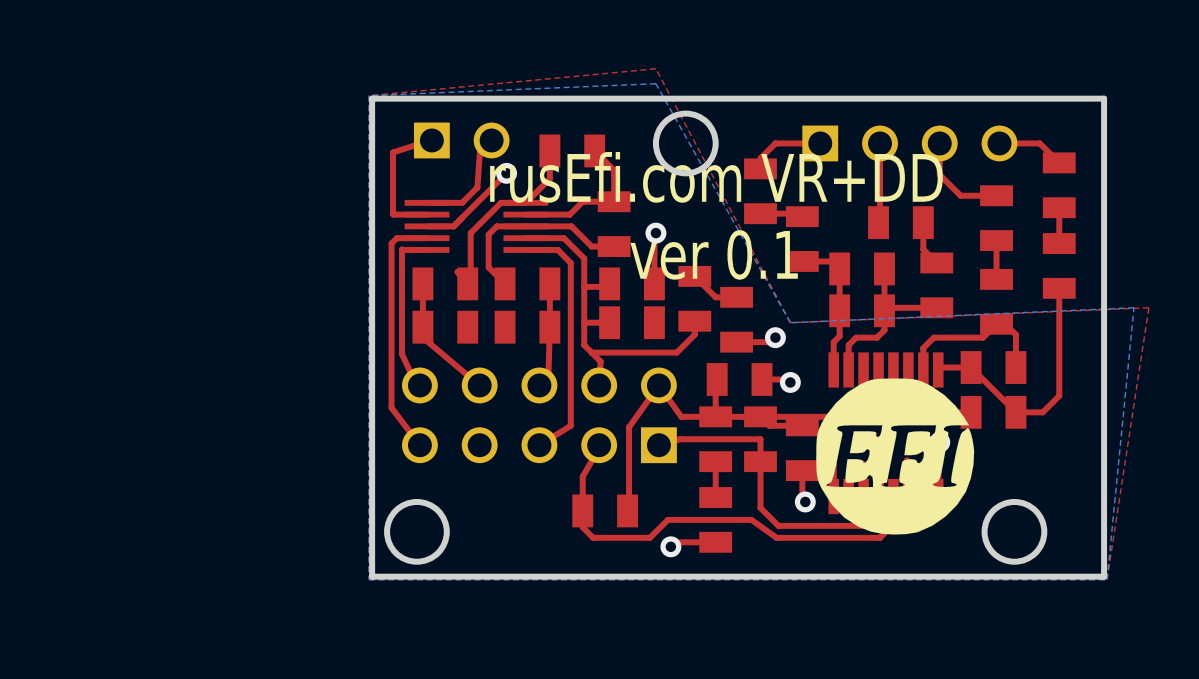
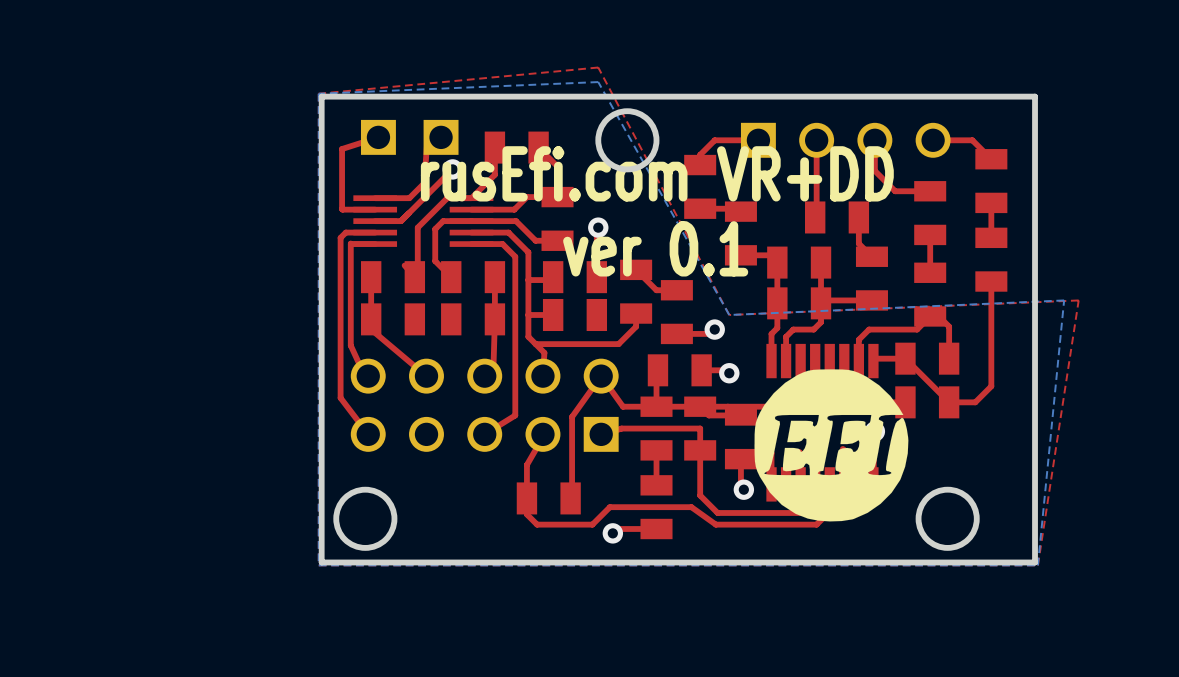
part: none -> (378, 137)
part: (461, 140) -> none
part: none -> (441, 137)

